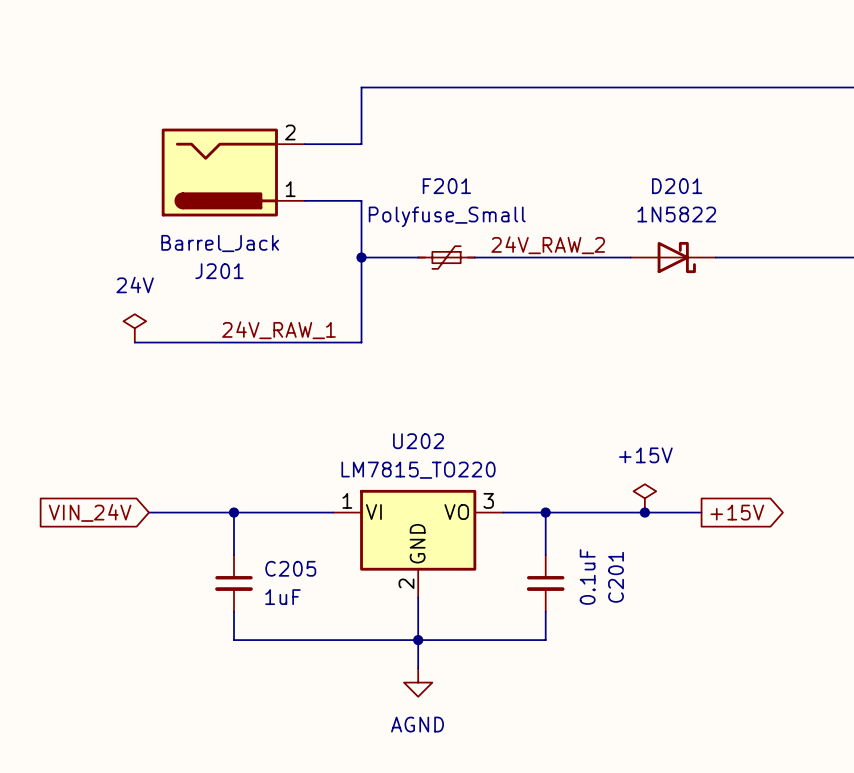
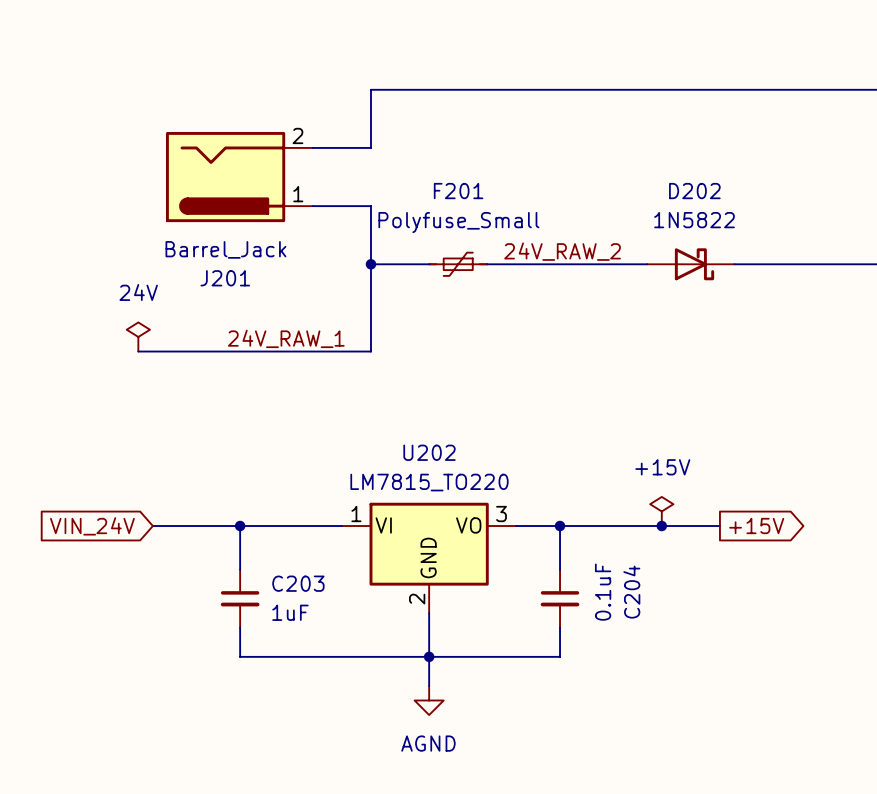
D201 name: D201 (677, 186) -> D202 (694, 191)
C205 name: C205 (290, 568) -> C203 (298, 583)
C201 name: C201 (616, 577) -> C204 (631, 592)

